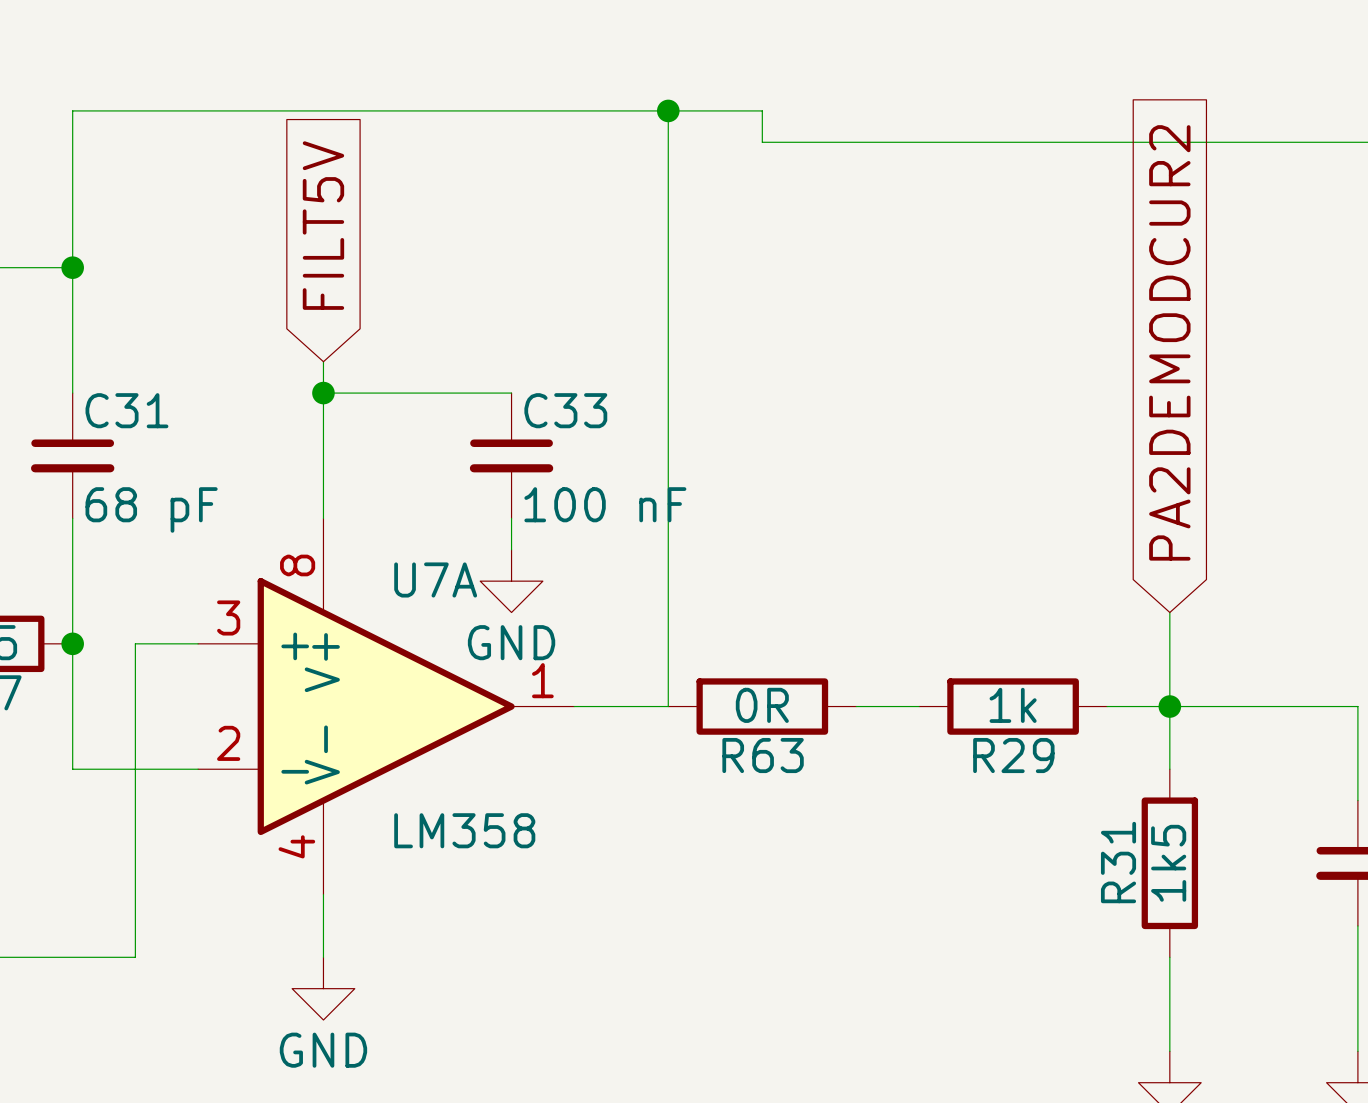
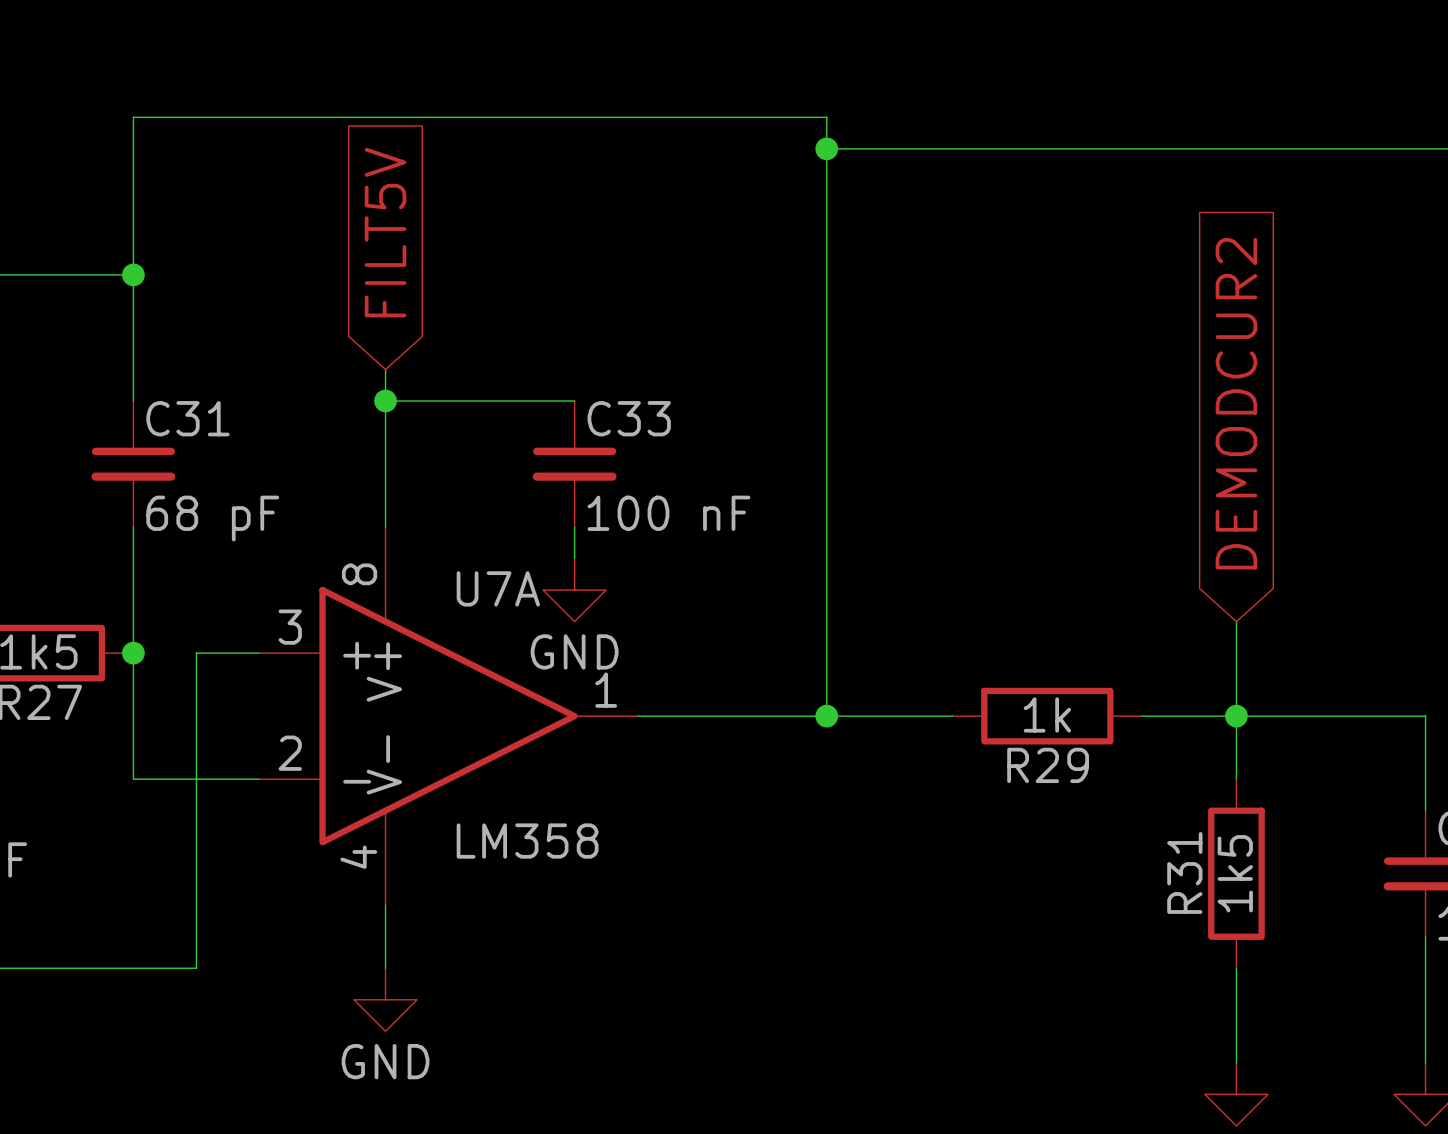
wire: (668, 110) (668, 706) -> (921, 716) (732, 716)
junction position: (668, 110) -> (826, 148)
wire: none -> (826, 148) (826, 716)
global label: PA2DEMODCUR2 (1169, 342) -> DEMODCUR2 (1236, 403)
R63: 0R (762, 706) -> none
junction: none -> (826, 716)
R29 position: (1013, 706) -> (1047, 716)

